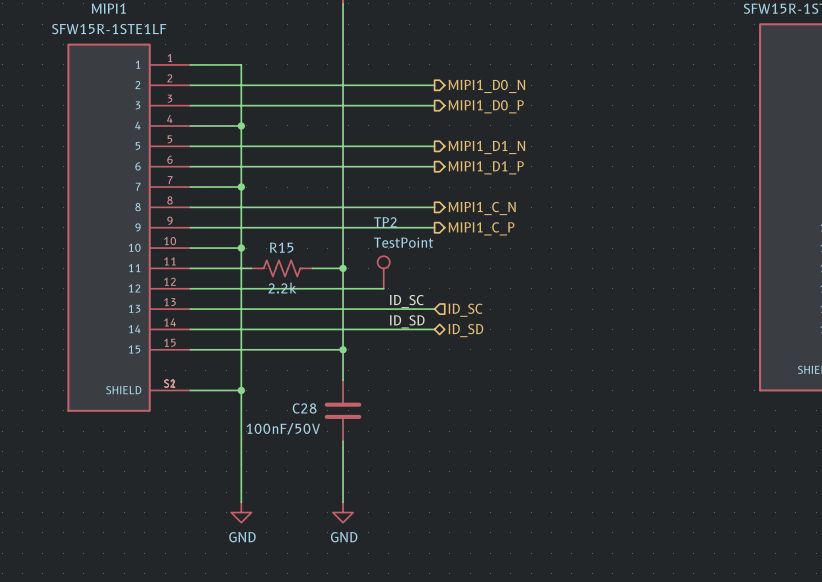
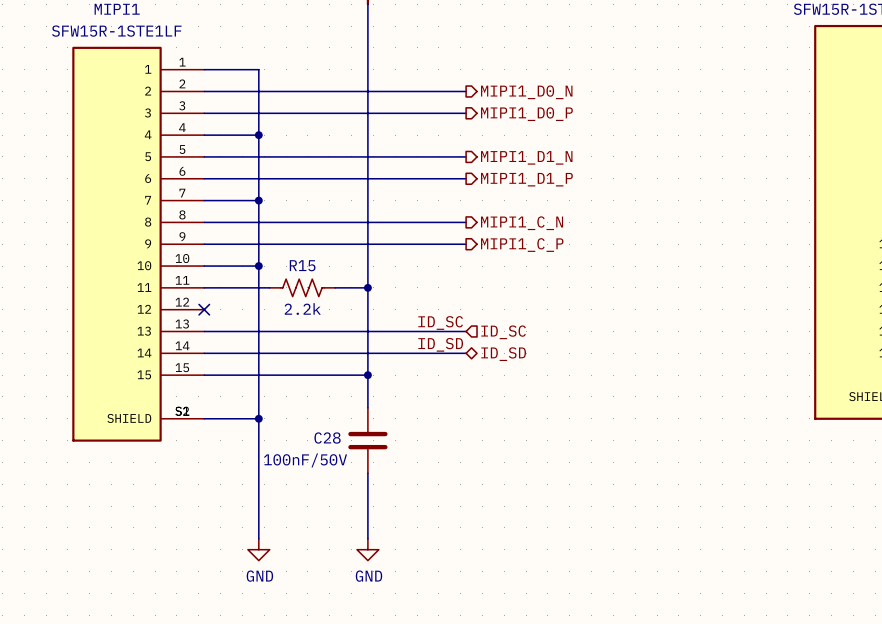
TP2: TestPoint (383, 272) -> none
wire: (190, 288) (383, 288) -> none
no-connect mark: none -> (204, 309)

